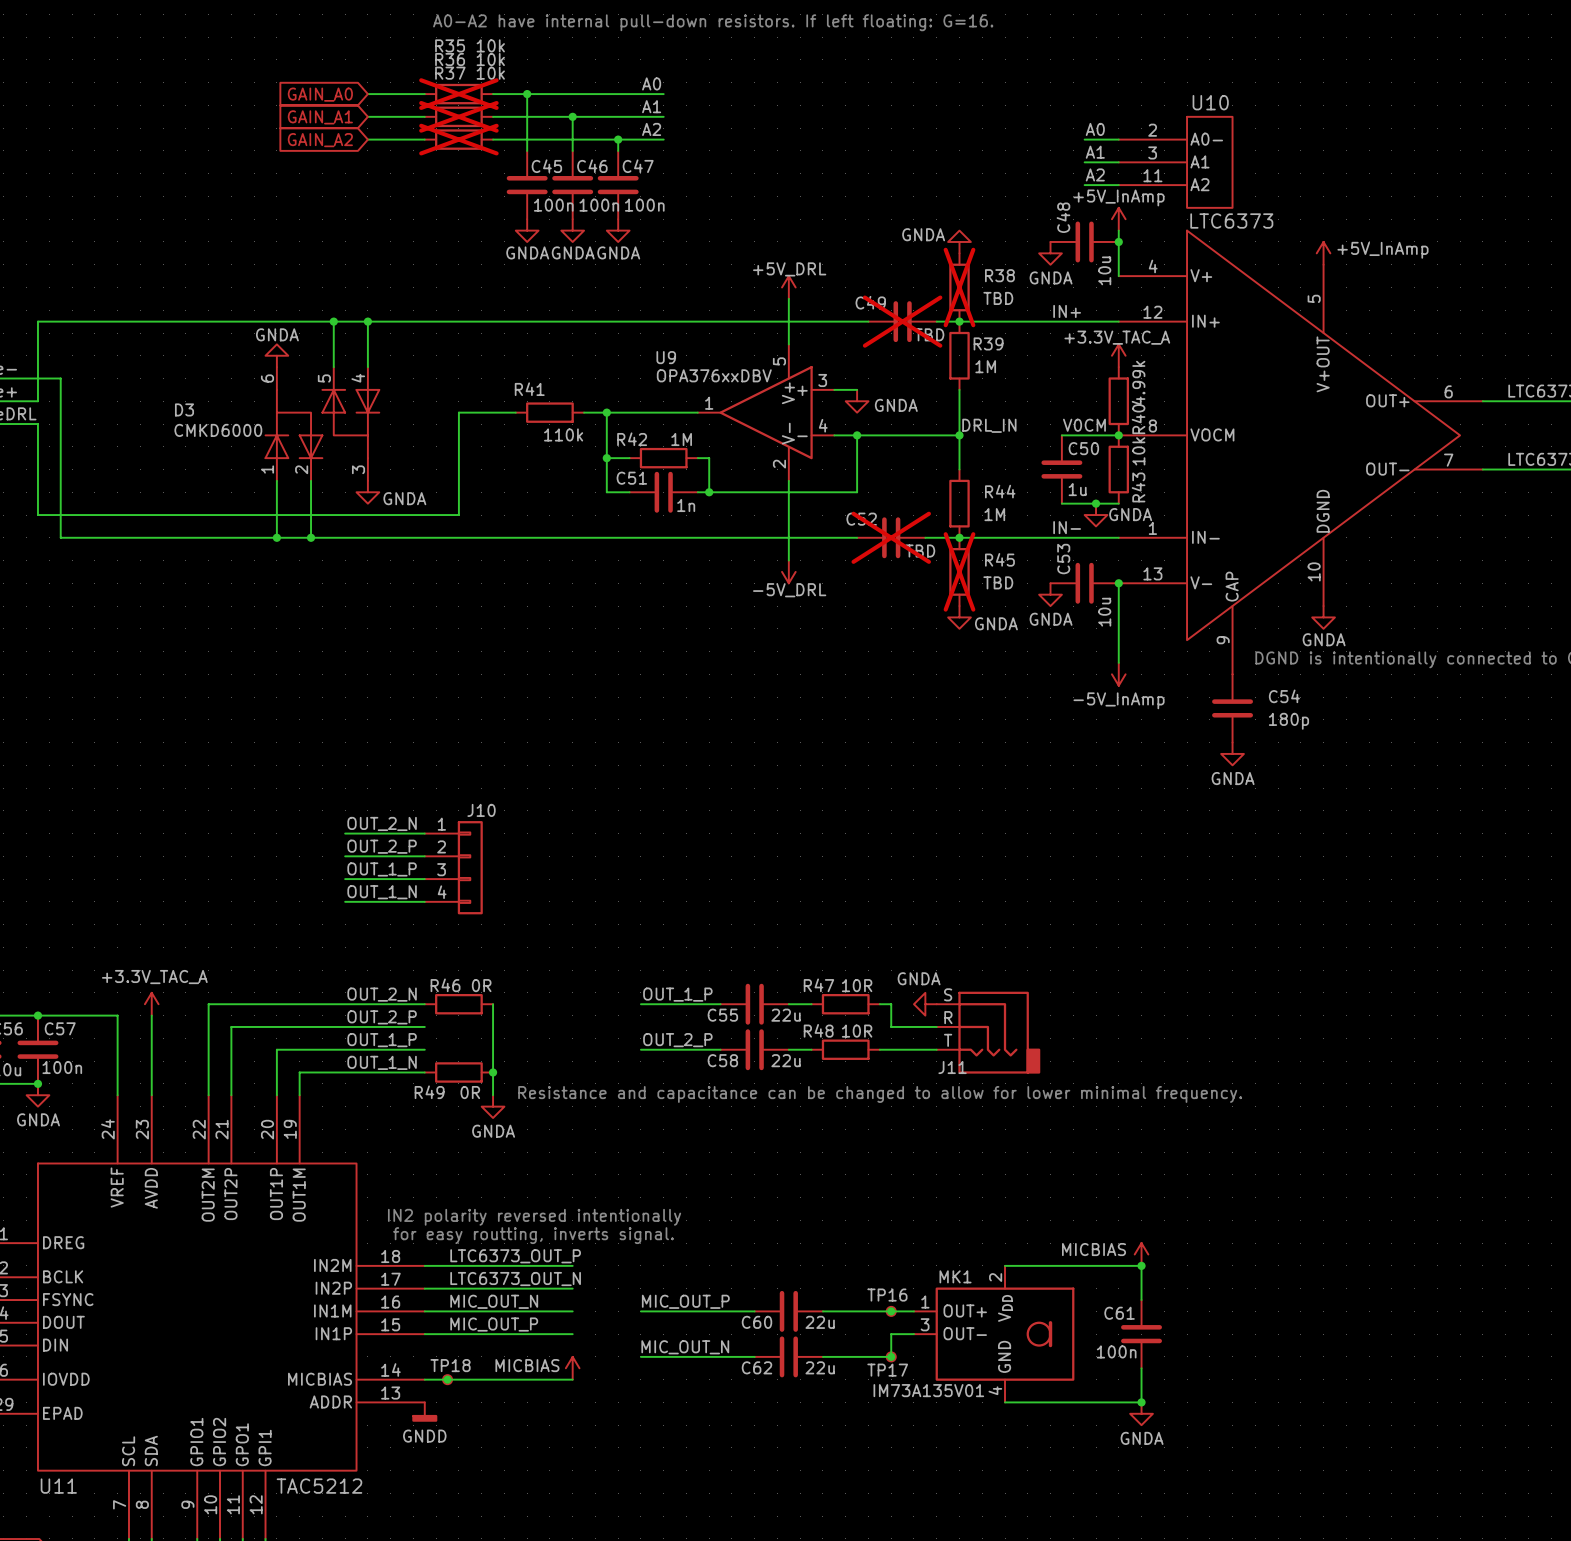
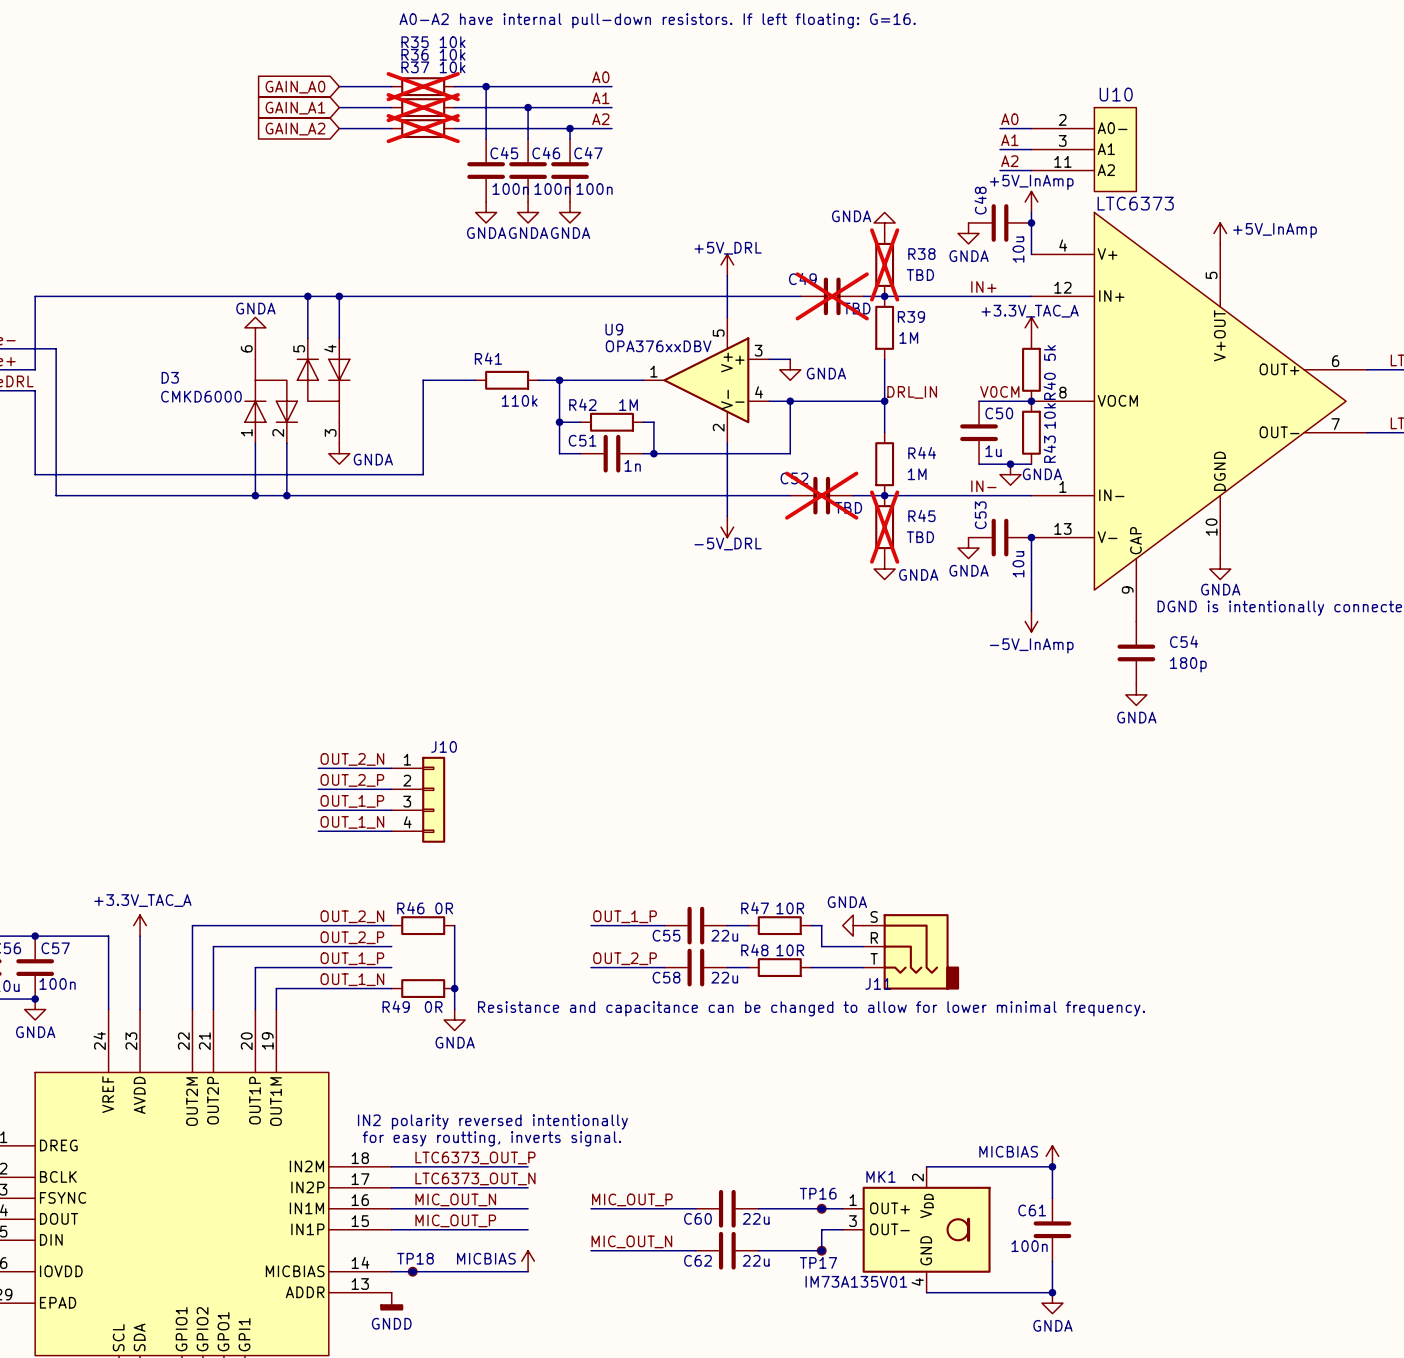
R40 value: 4.99k (1138, 383) -> 5k (1049, 353)

